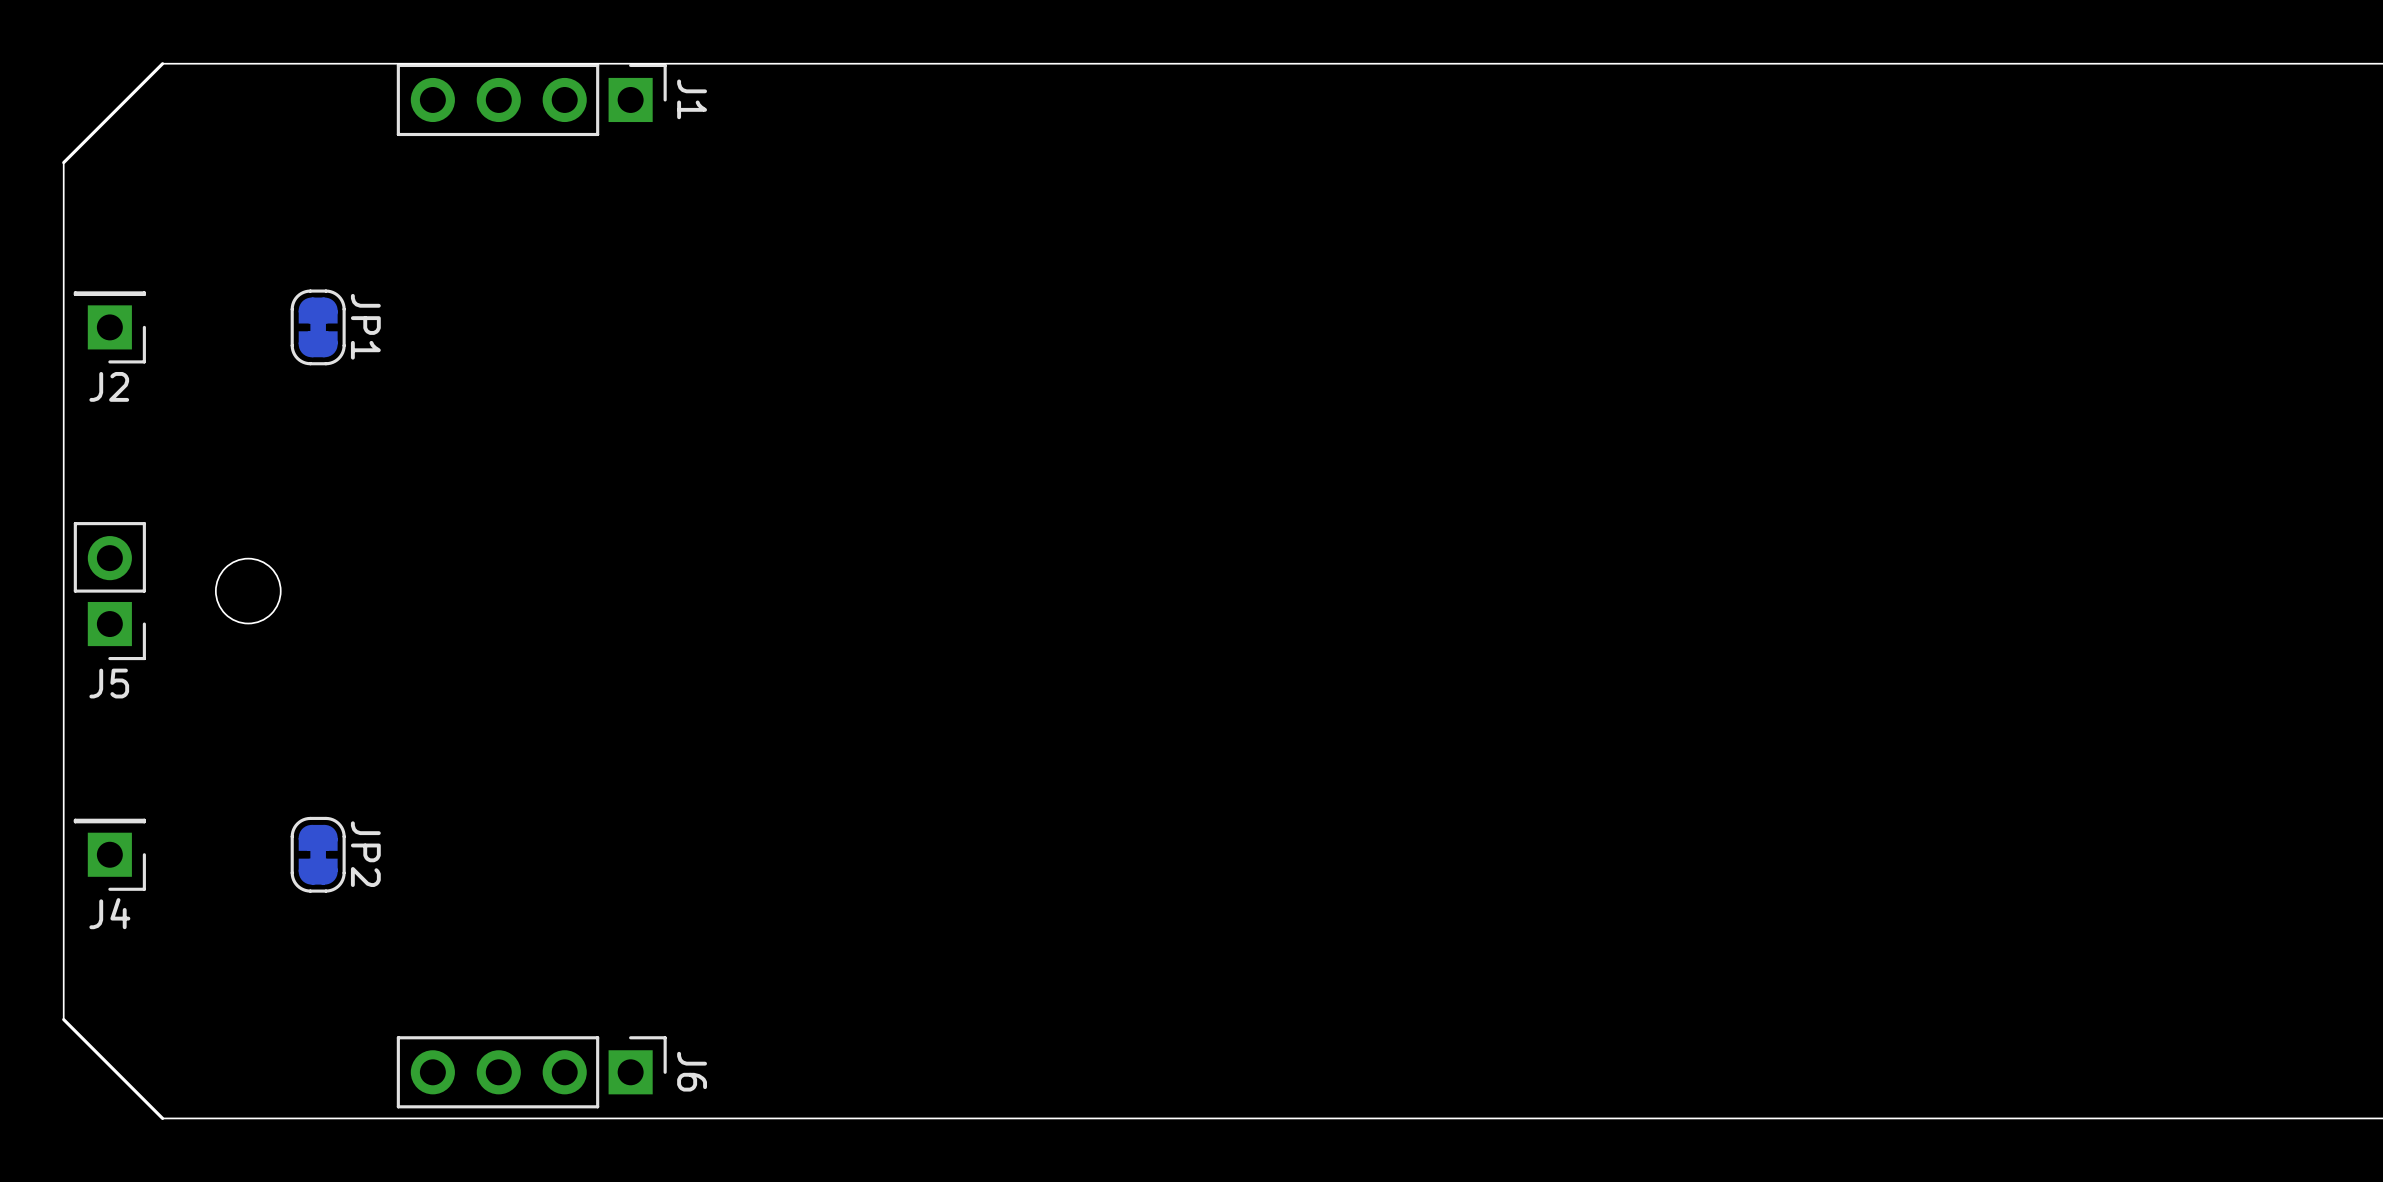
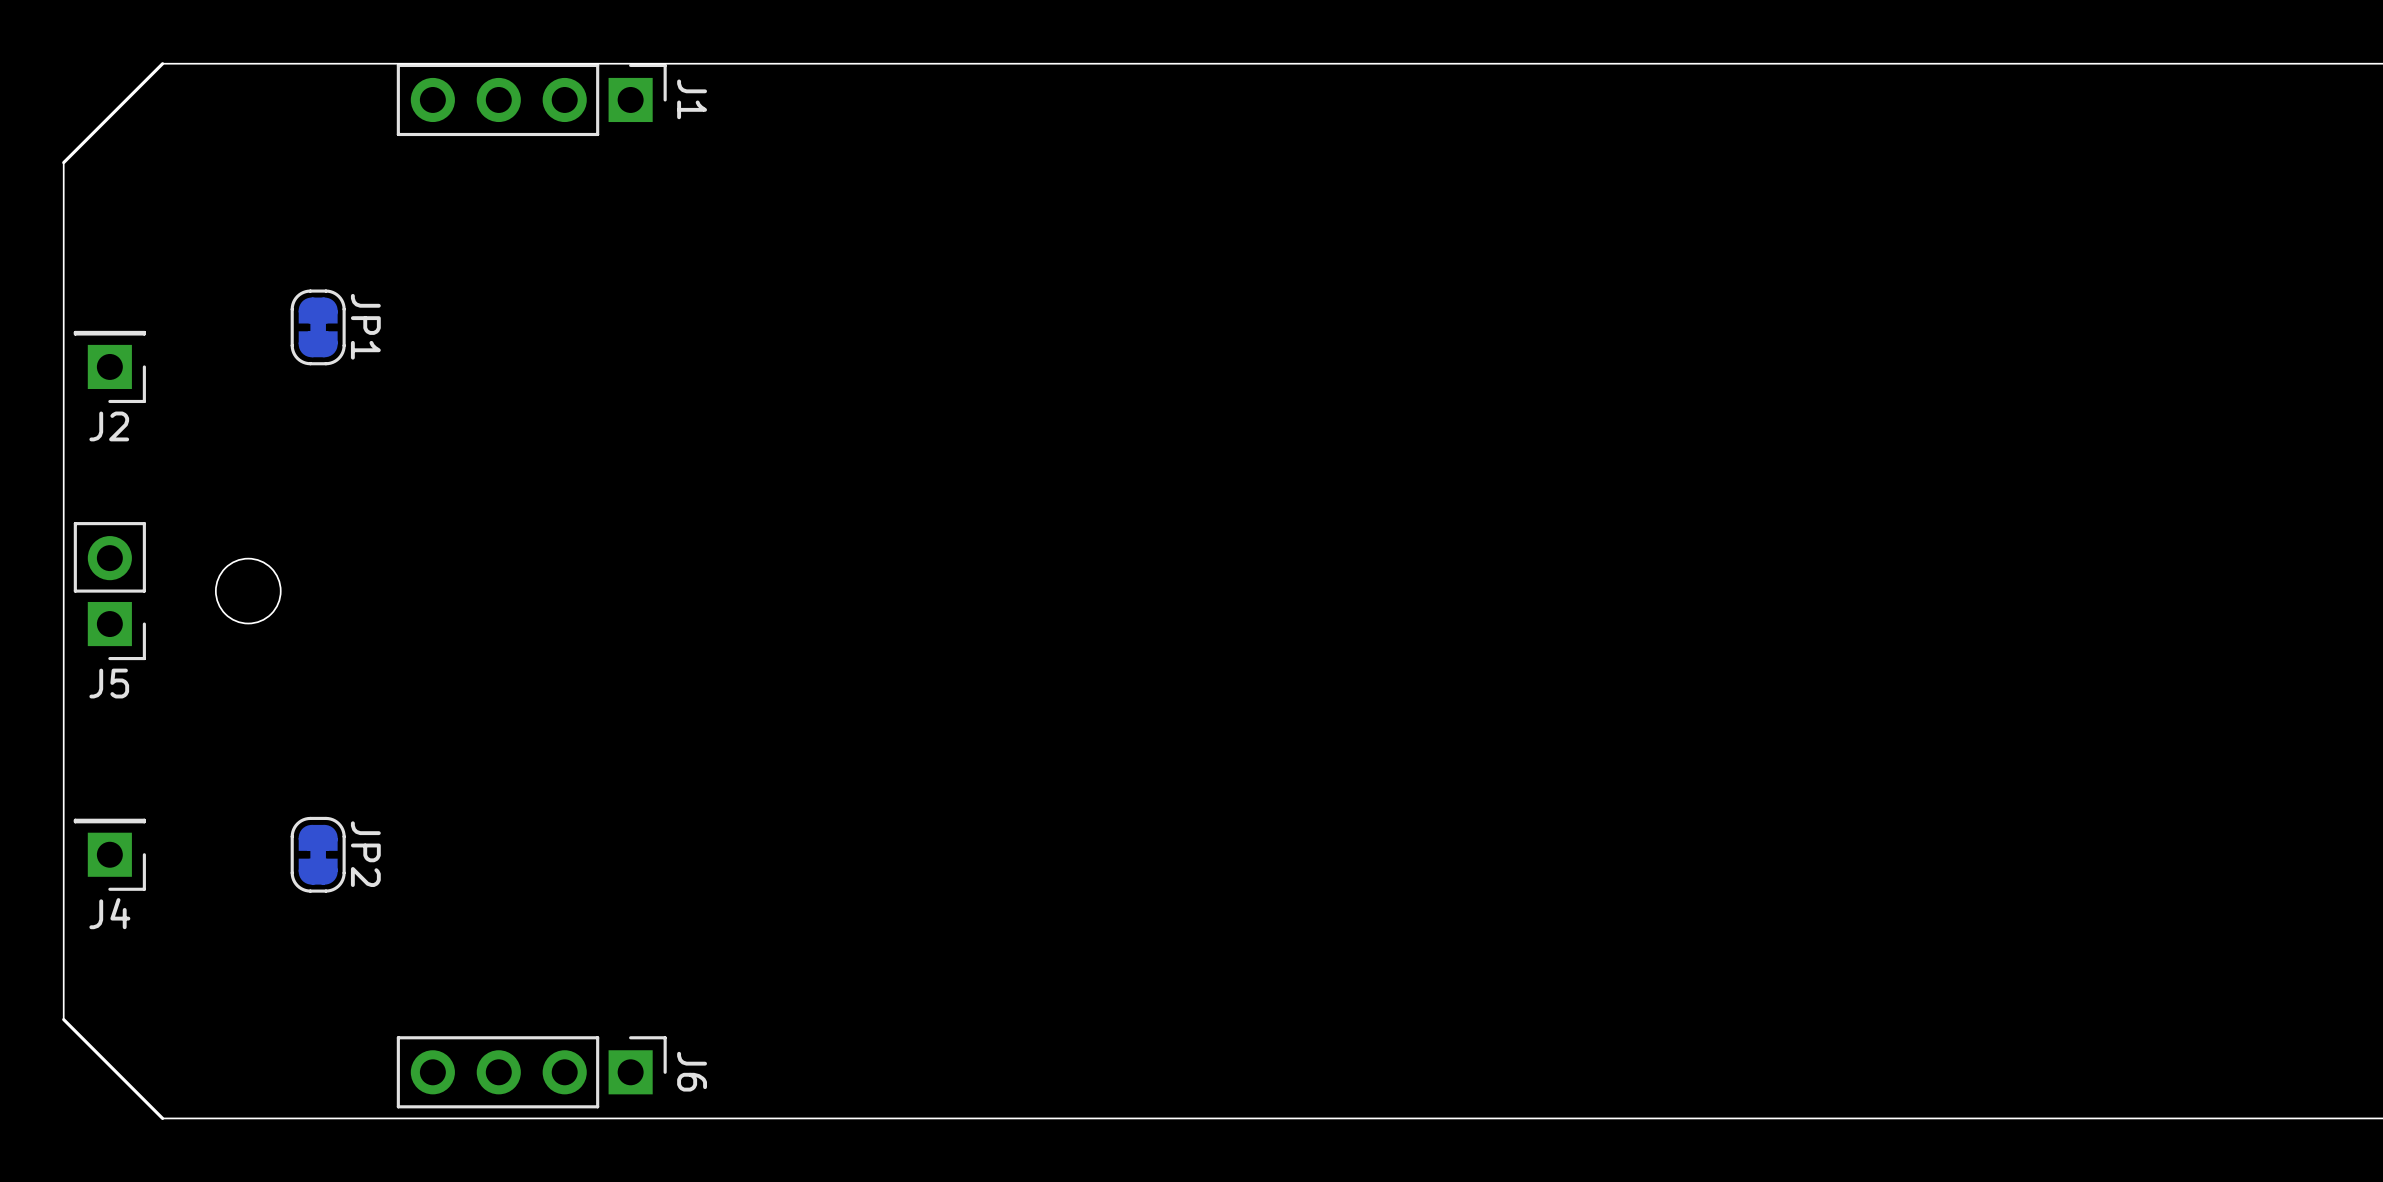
J2 position: (109, 327) -> (109, 366)

